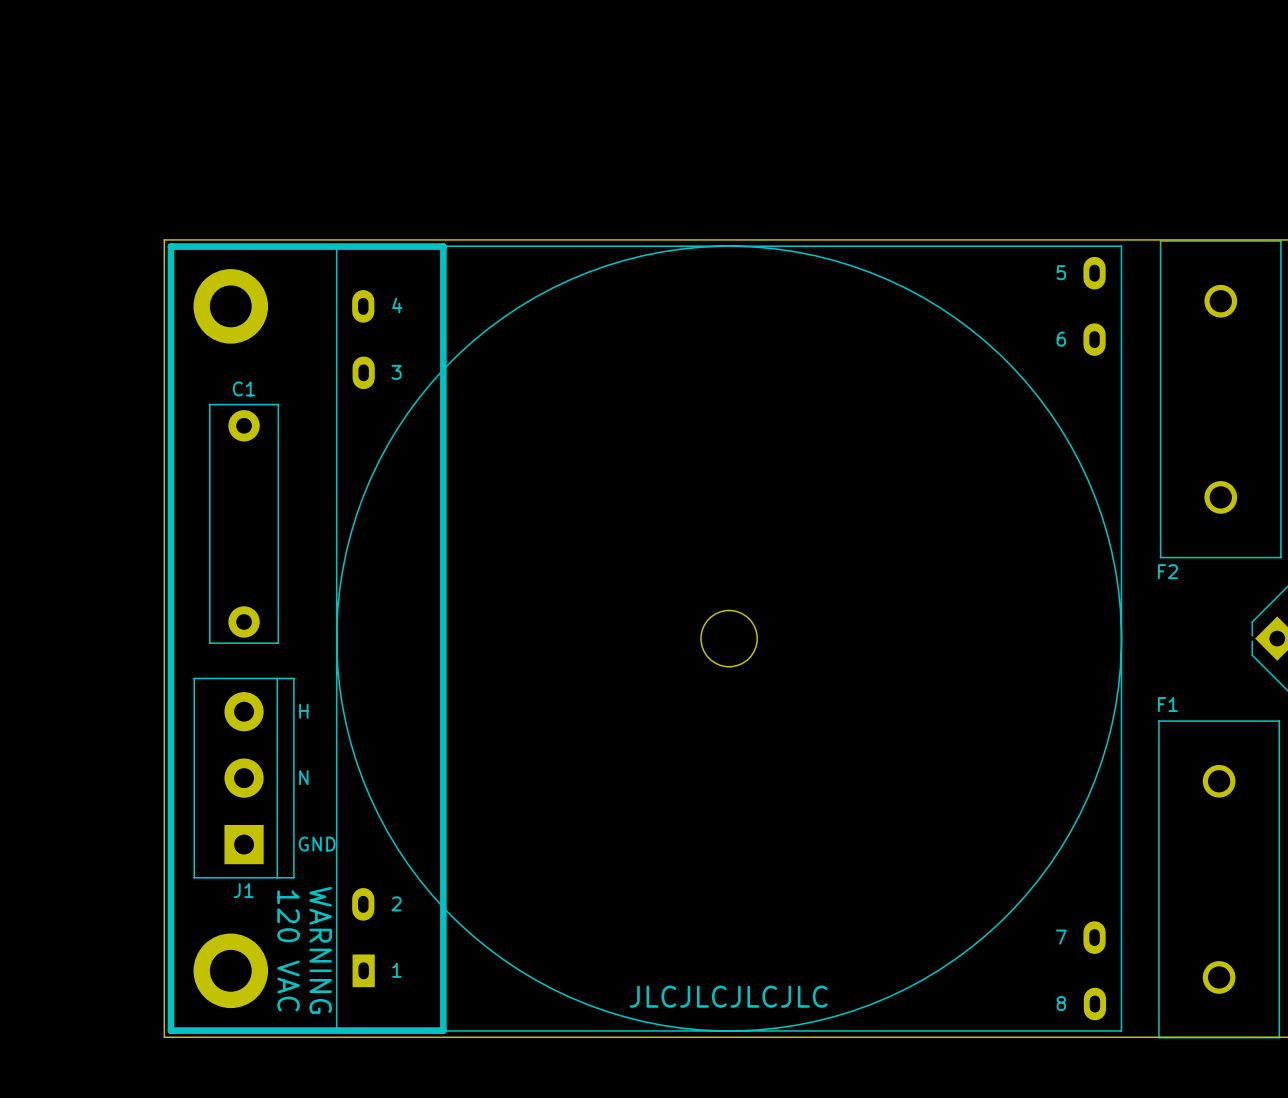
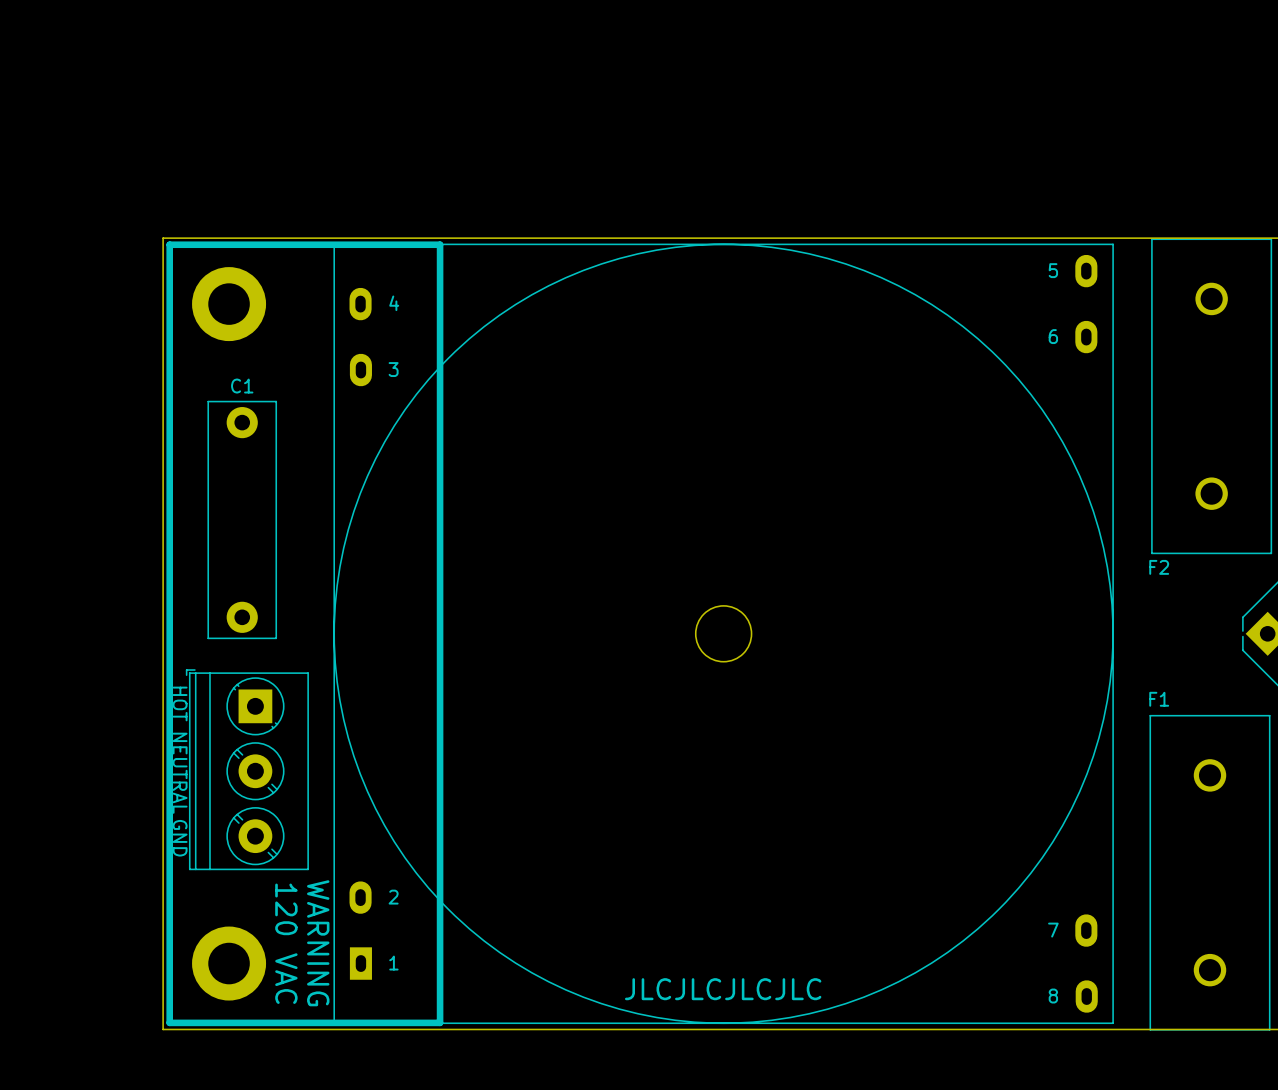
text: none -> HOT (180, 703)
text: H (303, 711) -> none
part: none -> (247, 769)
text: N (303, 777) -> none
J1: (244, 778) -> none
text: none -> NEUTRAL (180, 773)
text rotation: 0° (317, 844) -> 90° clockwise (180, 838)
text position: GND (317, 844) -> GND (180, 838)

